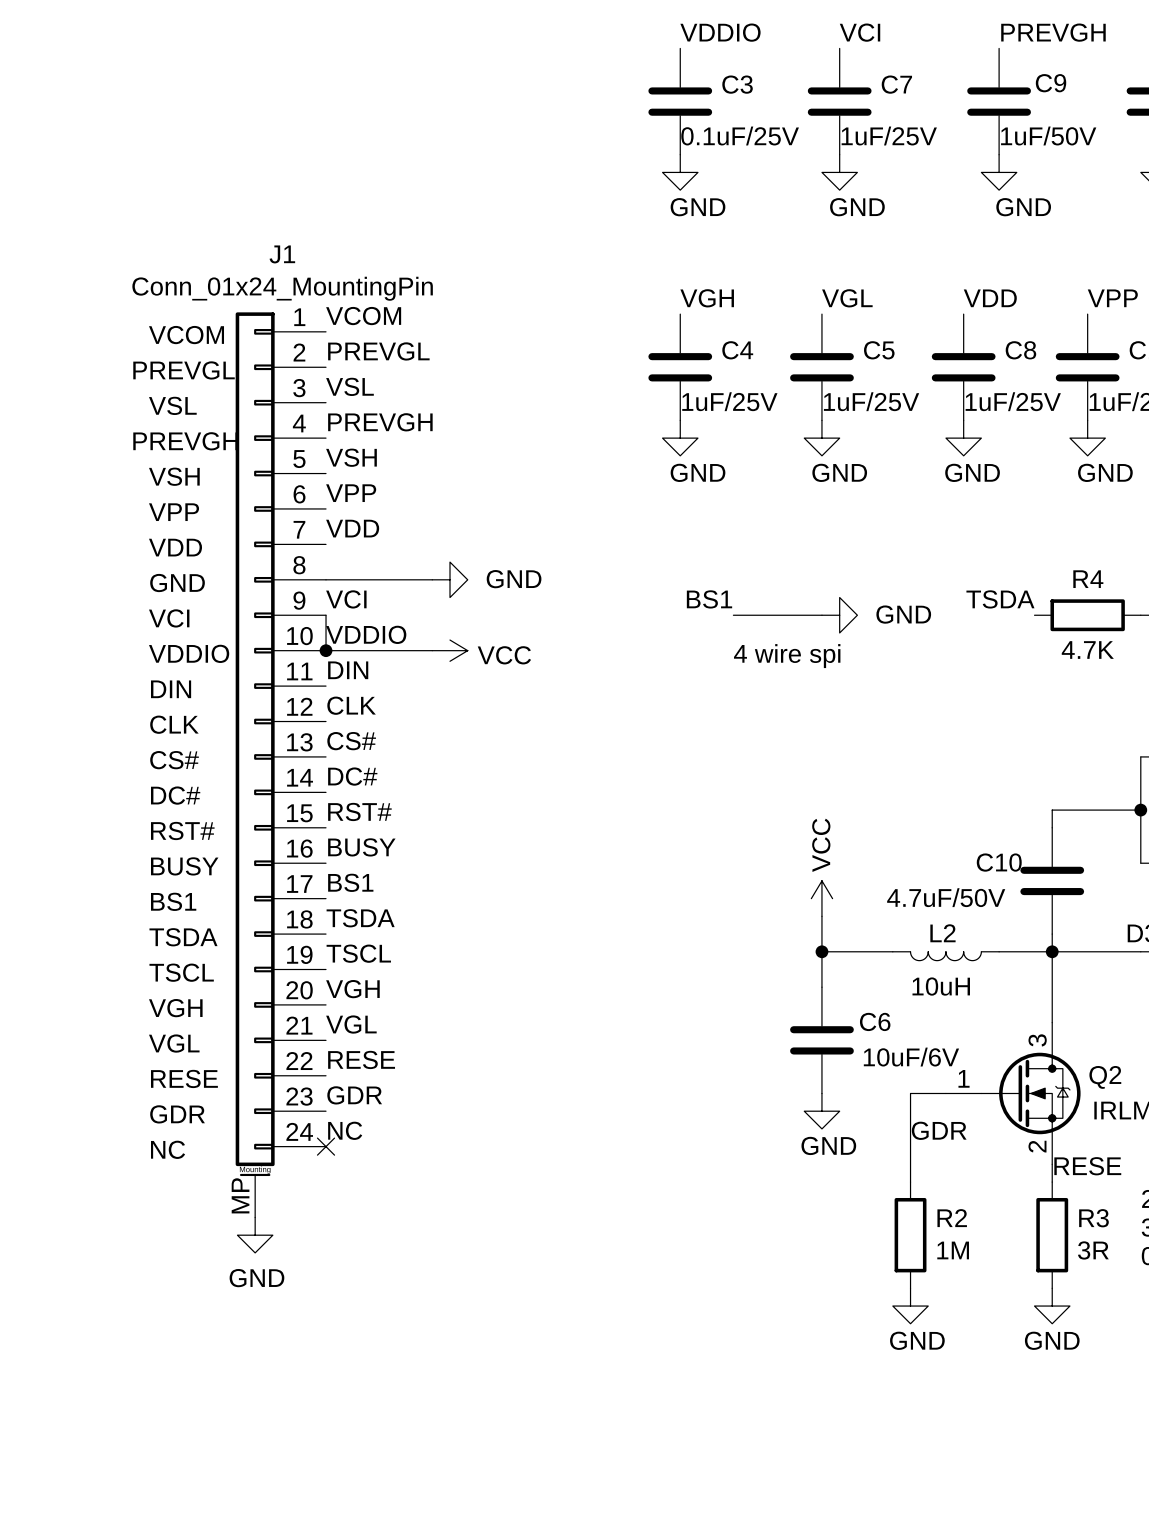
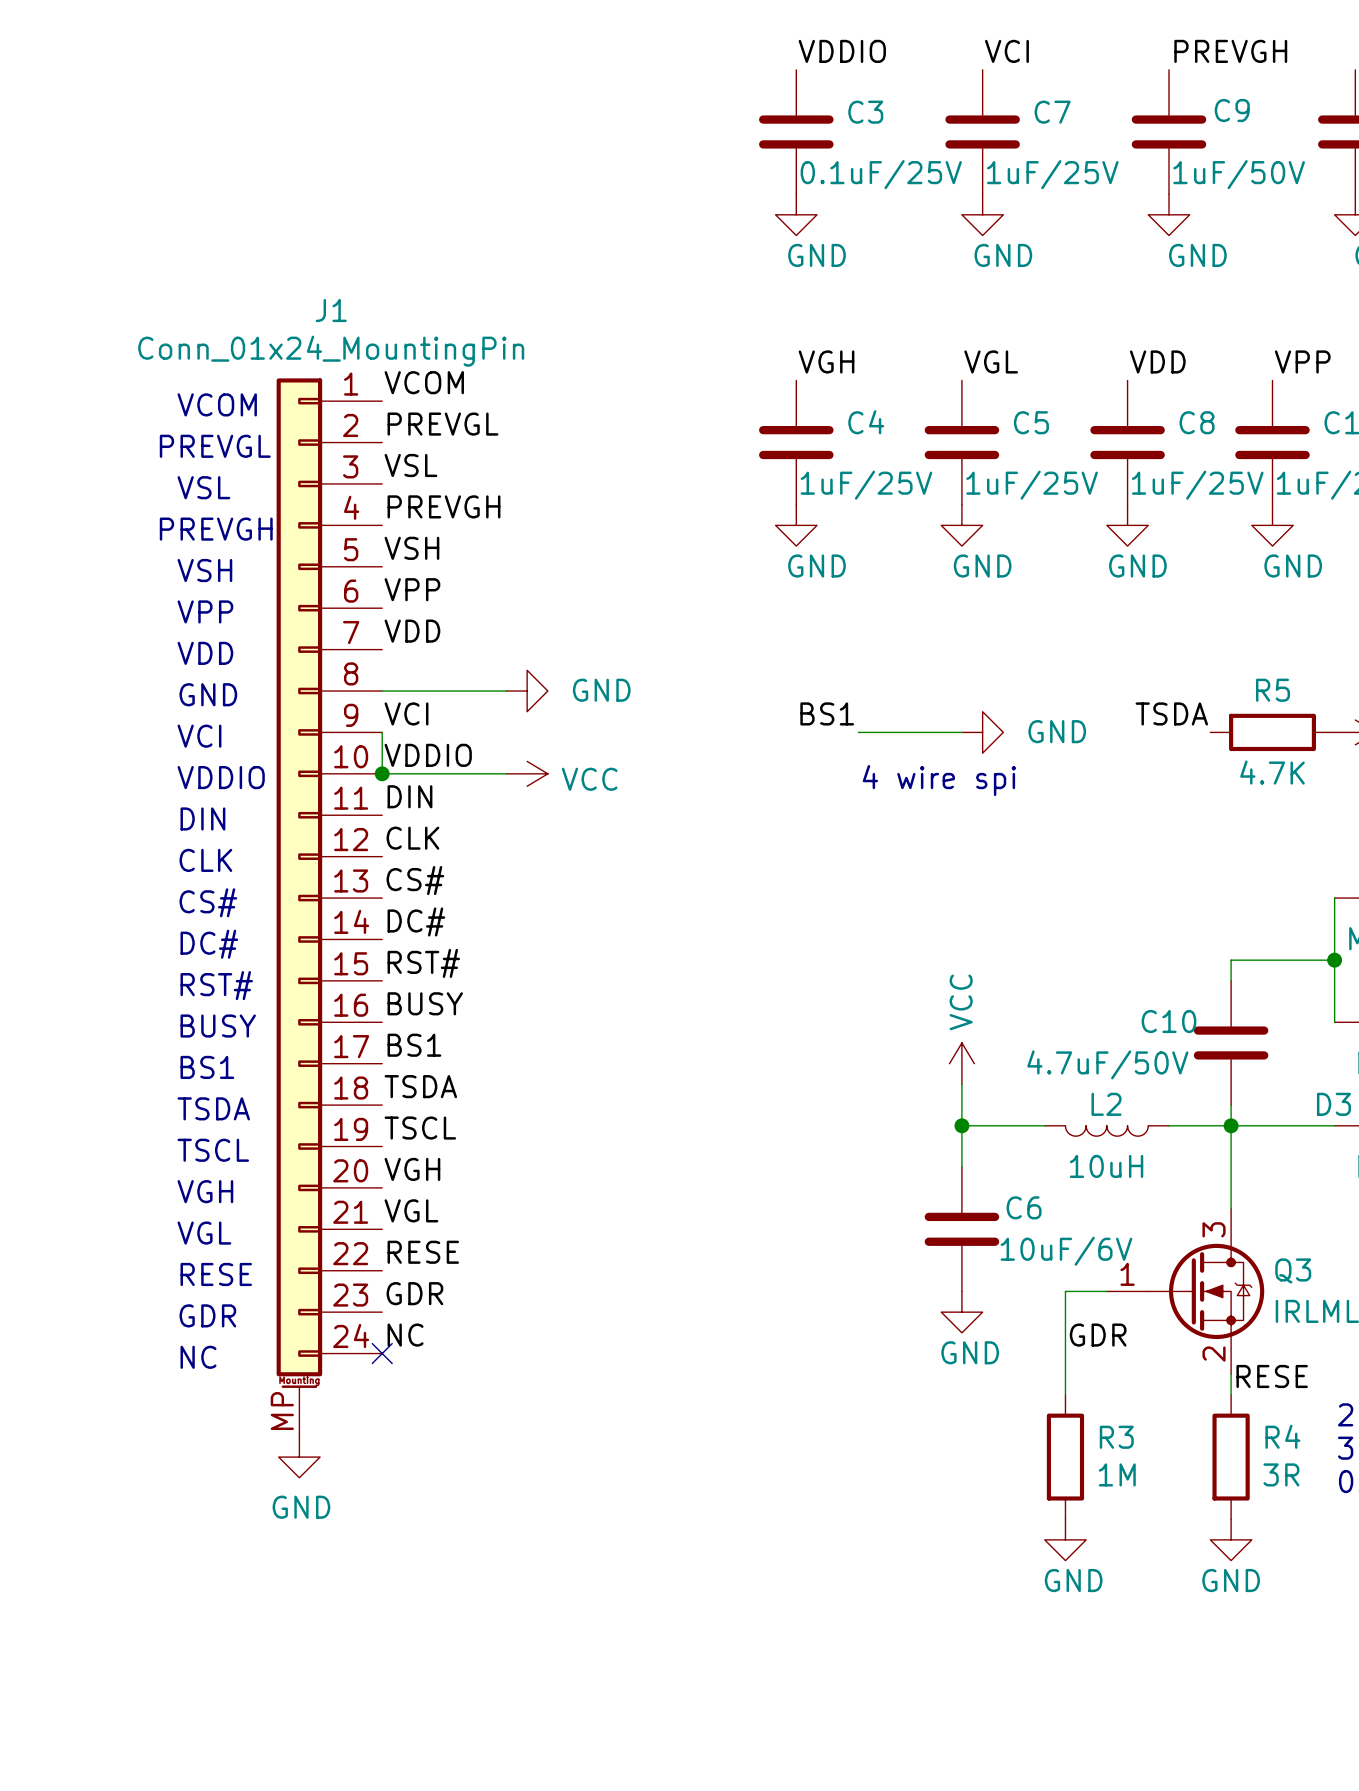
R4 name: R4 (1088, 579) -> R5 (1273, 690)
Q2 name: Q2 (1105, 1077) -> Q3 (1293, 1270)
R2 name: R2 (952, 1218) -> R3 (1116, 1437)
R3 name: R3 (1093, 1218) -> R4 (1282, 1436)

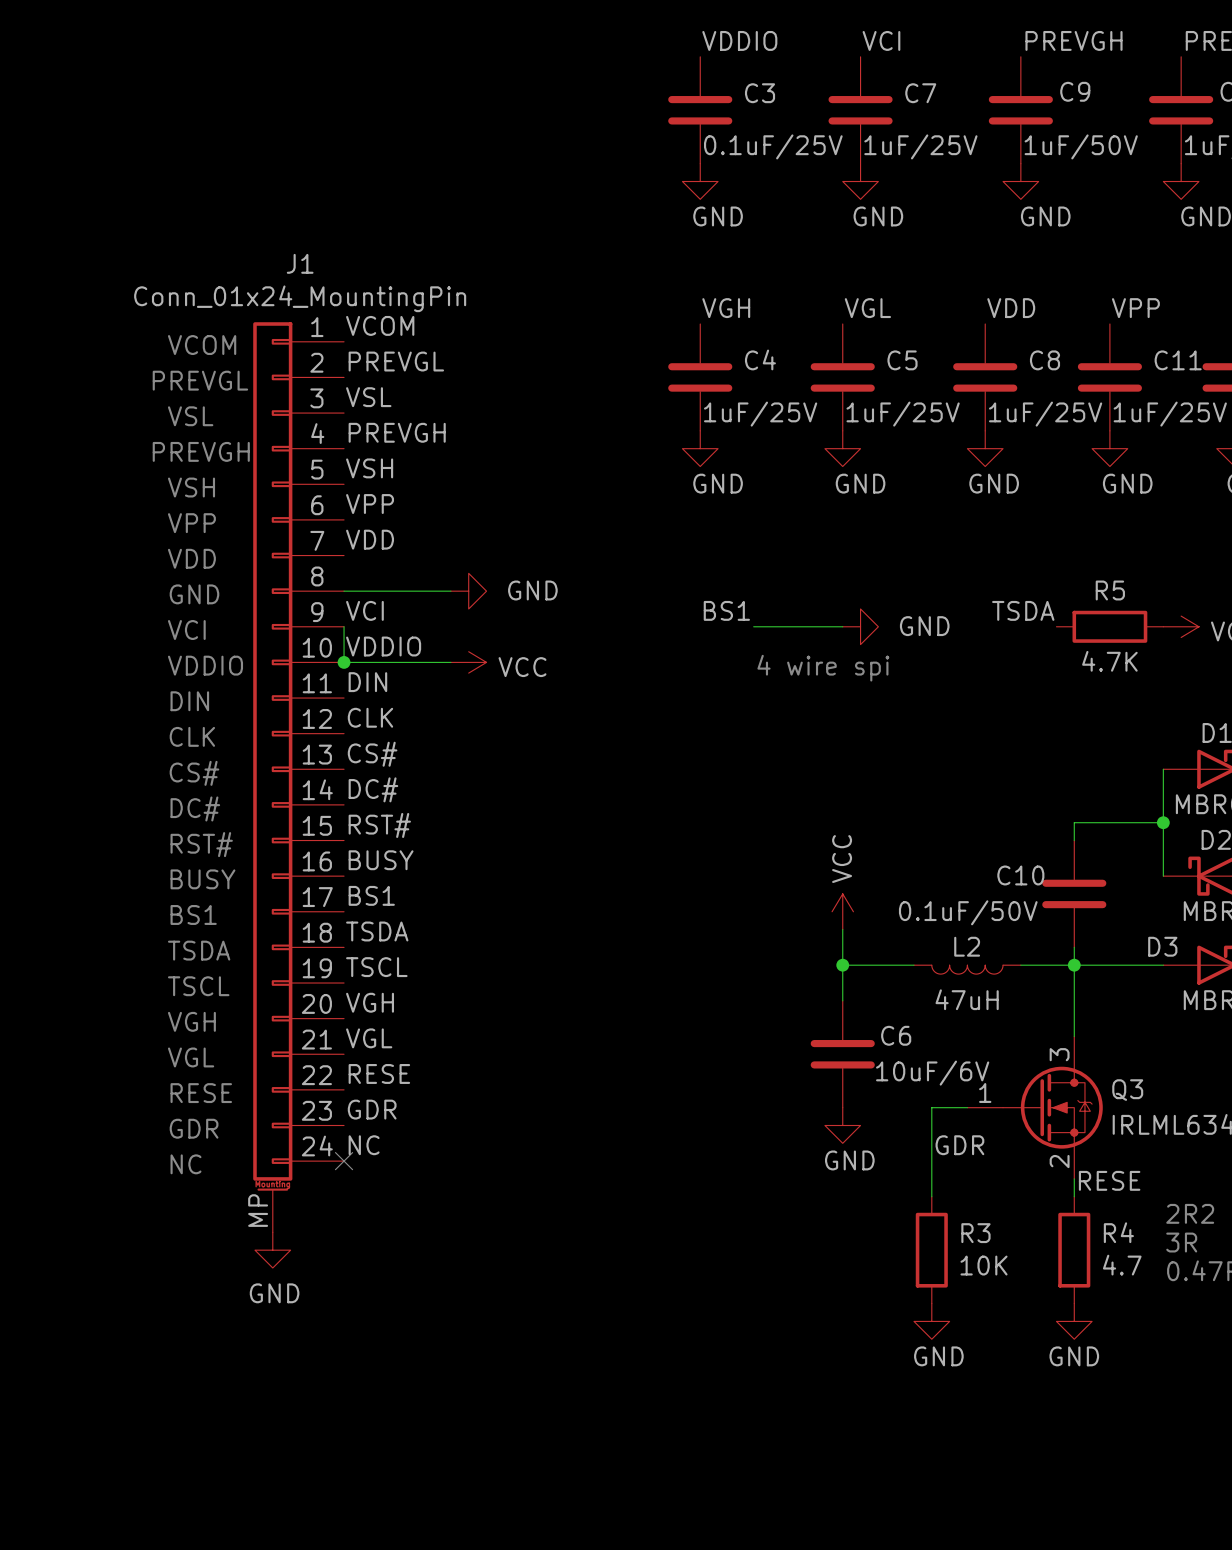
C10 value: 4.7uF/50V (1107, 1064) -> 0.1uF/50V (968, 912)
L2 value: 10uH (1106, 1166) -> 47uH (967, 999)
R3 value: 1M (1117, 1474) -> 10K (984, 1265)
R4 value: 3R (1281, 1474) -> 4.7 (1122, 1265)

